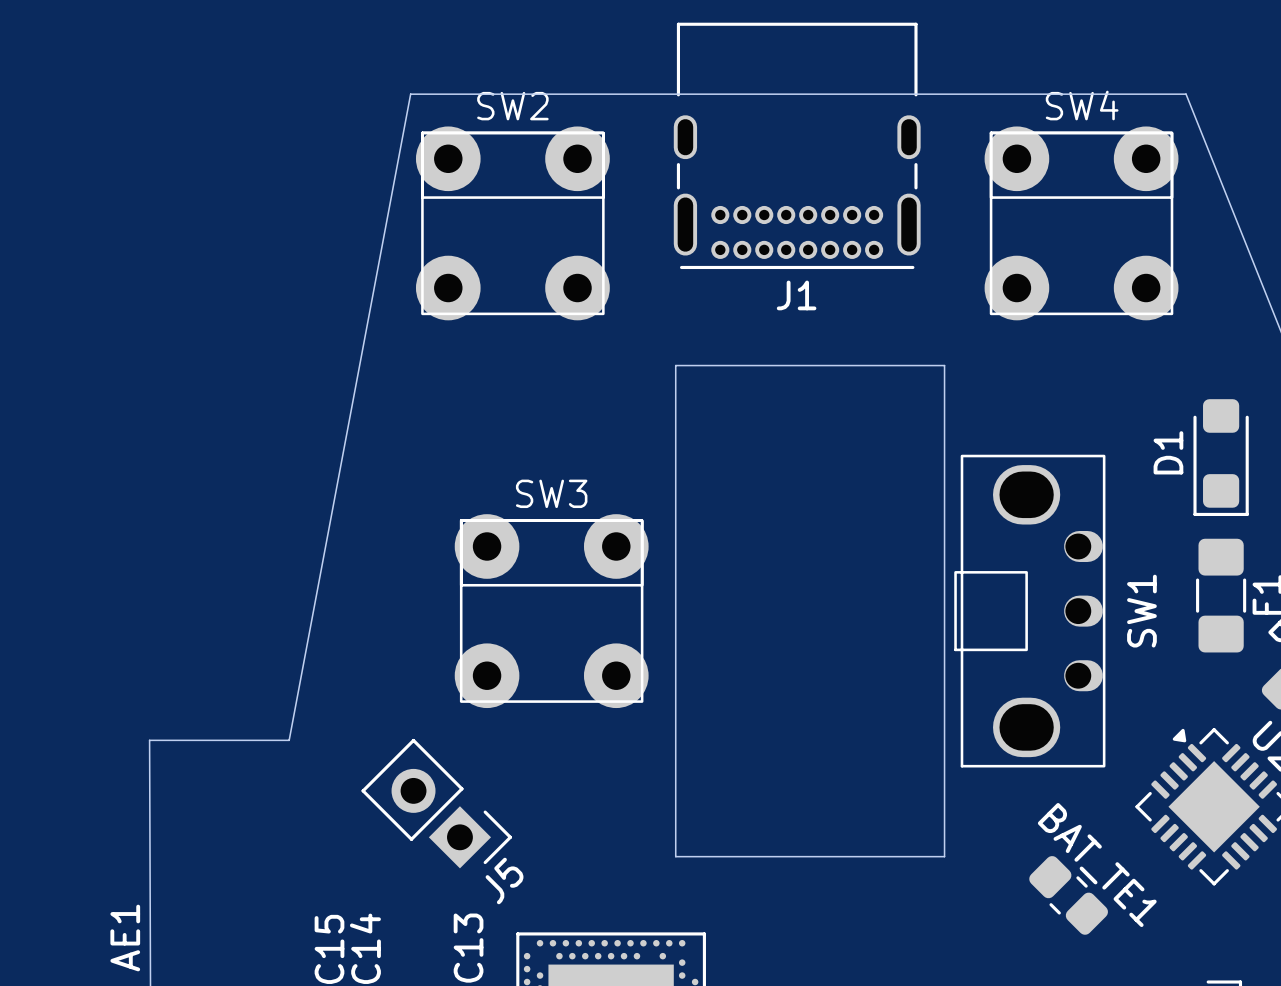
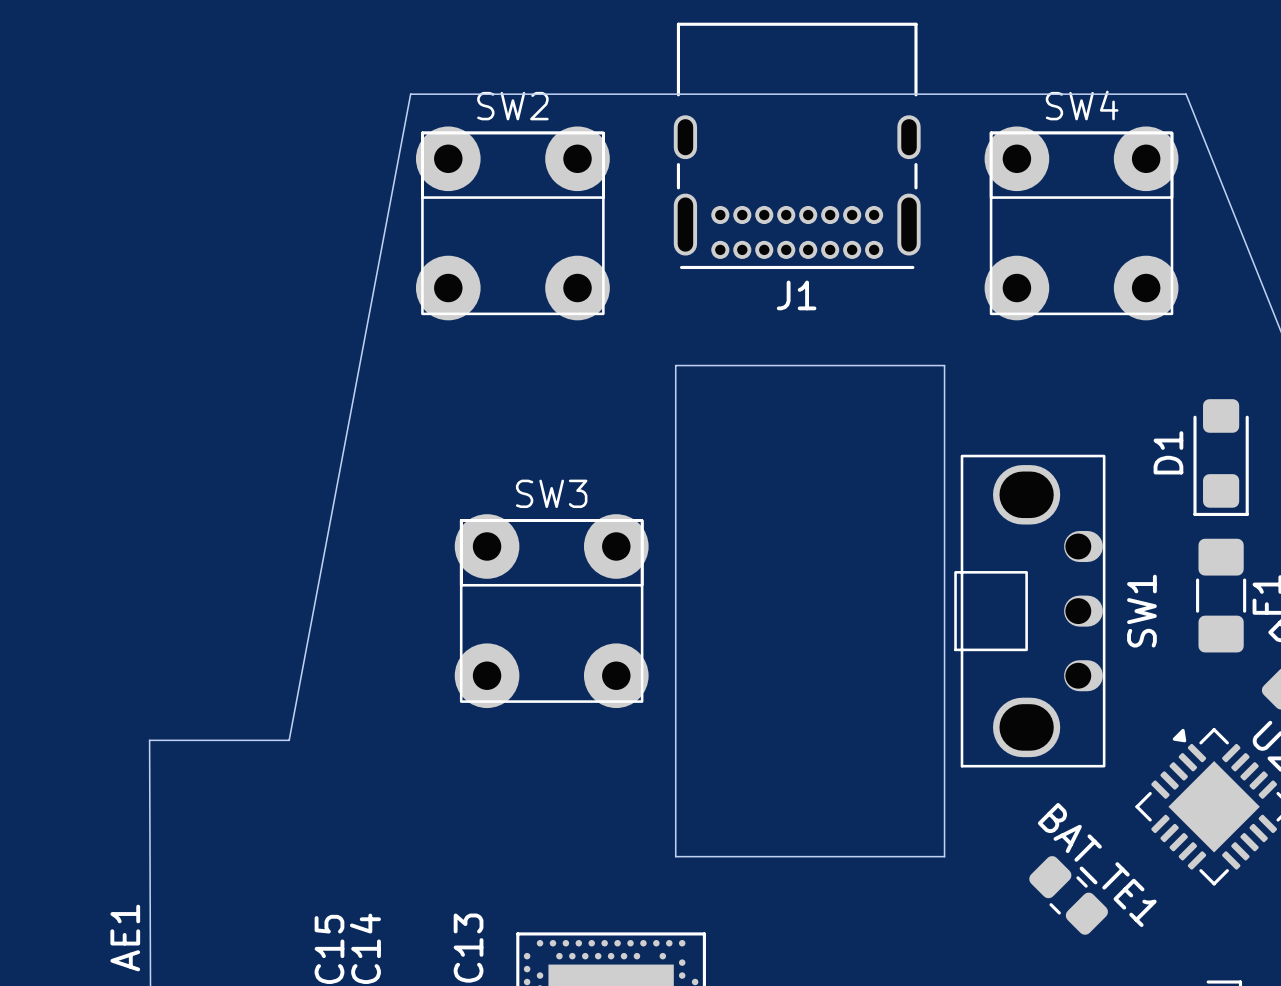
J5: (436, 803) -> none

